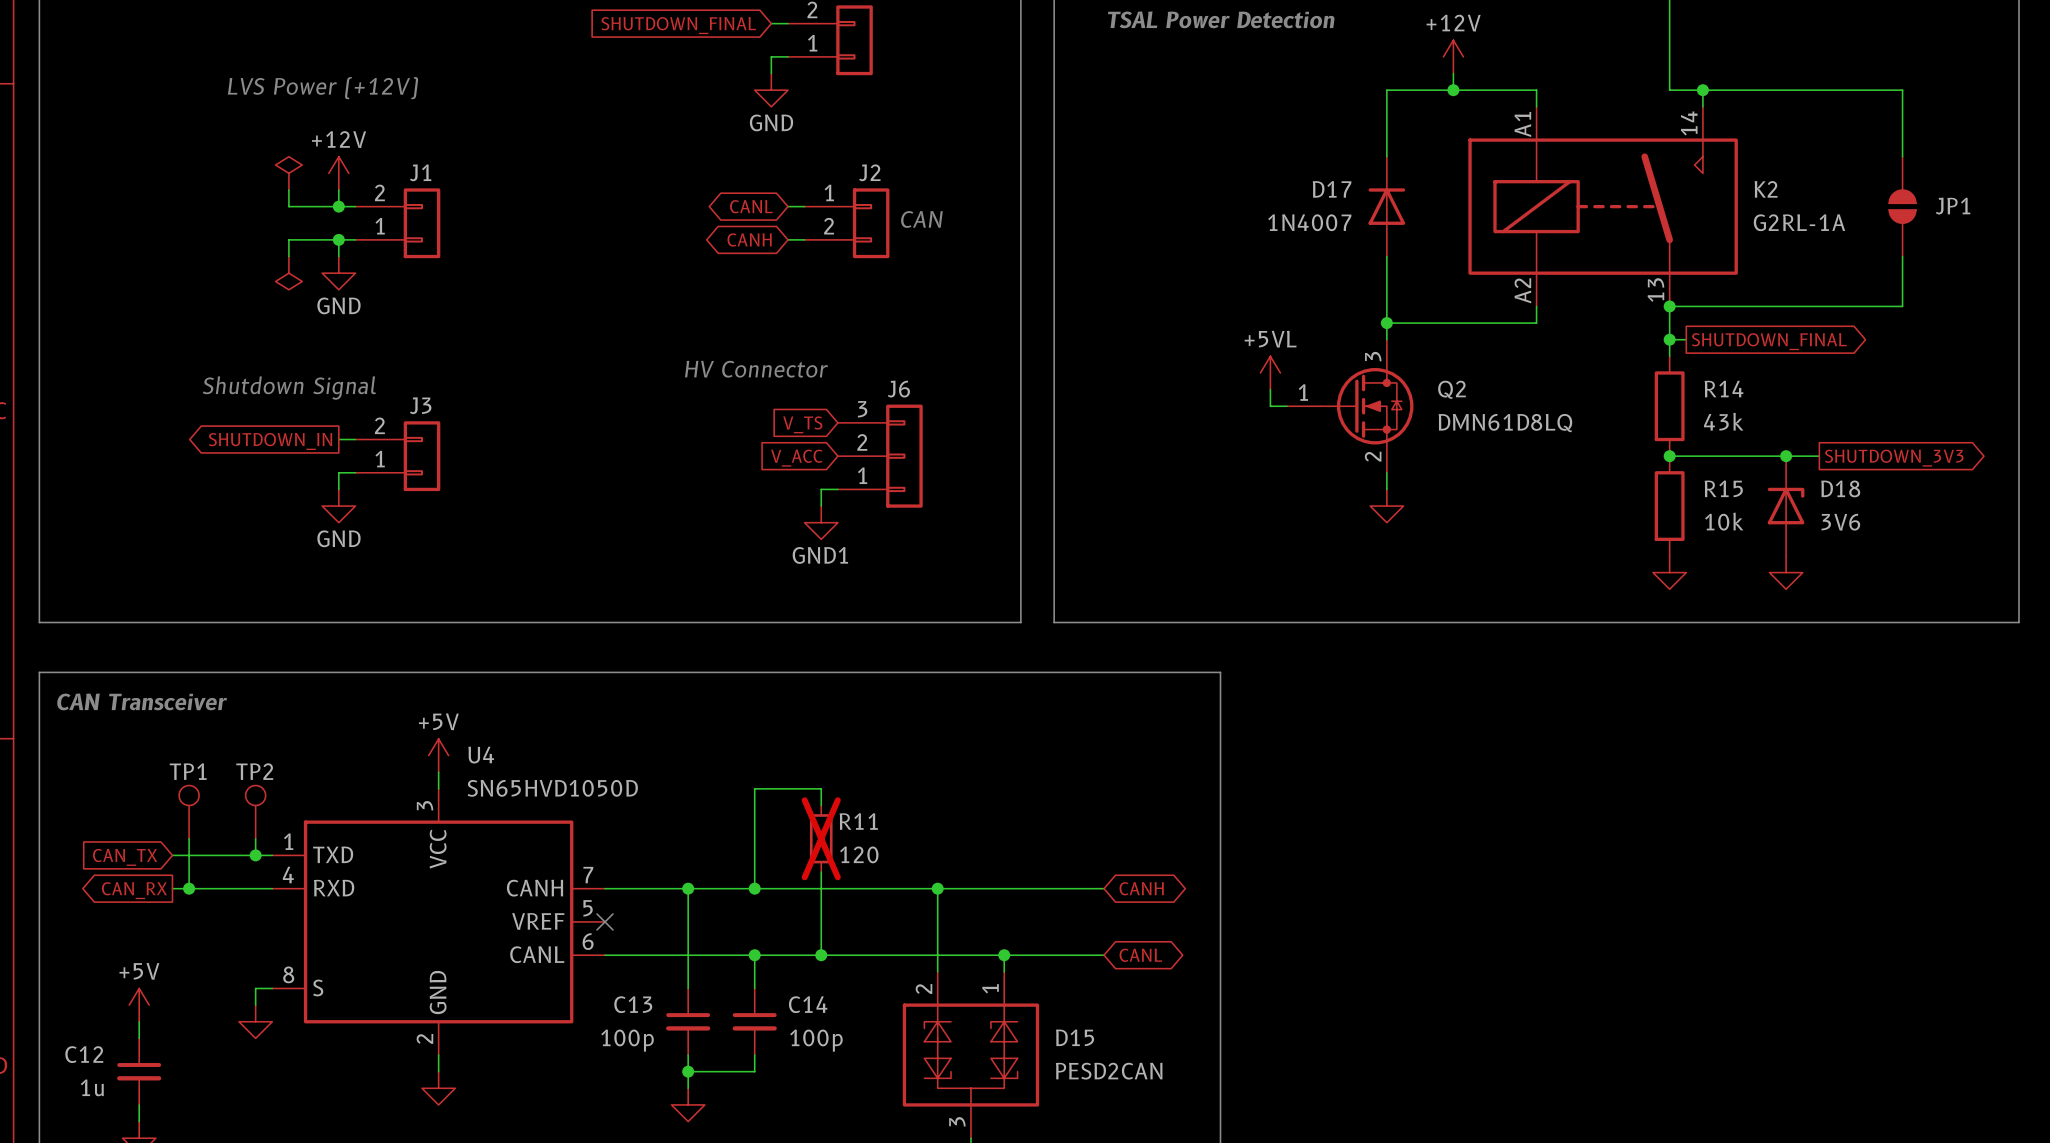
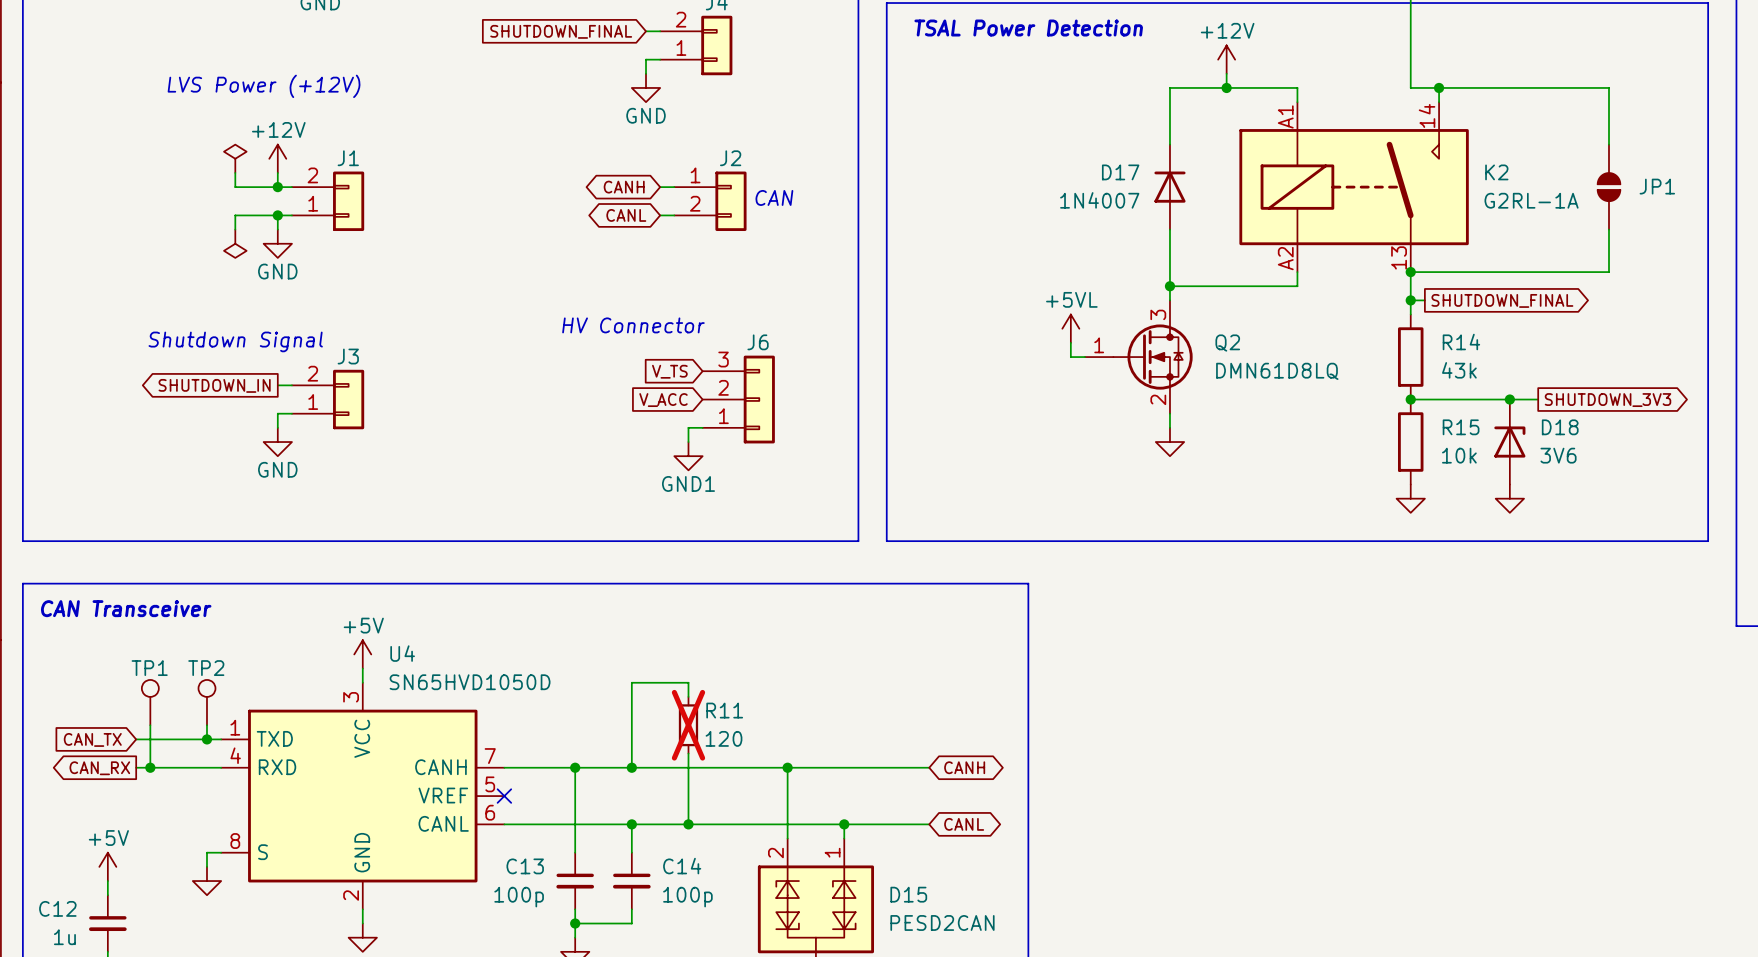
global label: CANL (751, 206) -> CANH (624, 187)
global label: CANH (749, 239) -> CANL (626, 215)

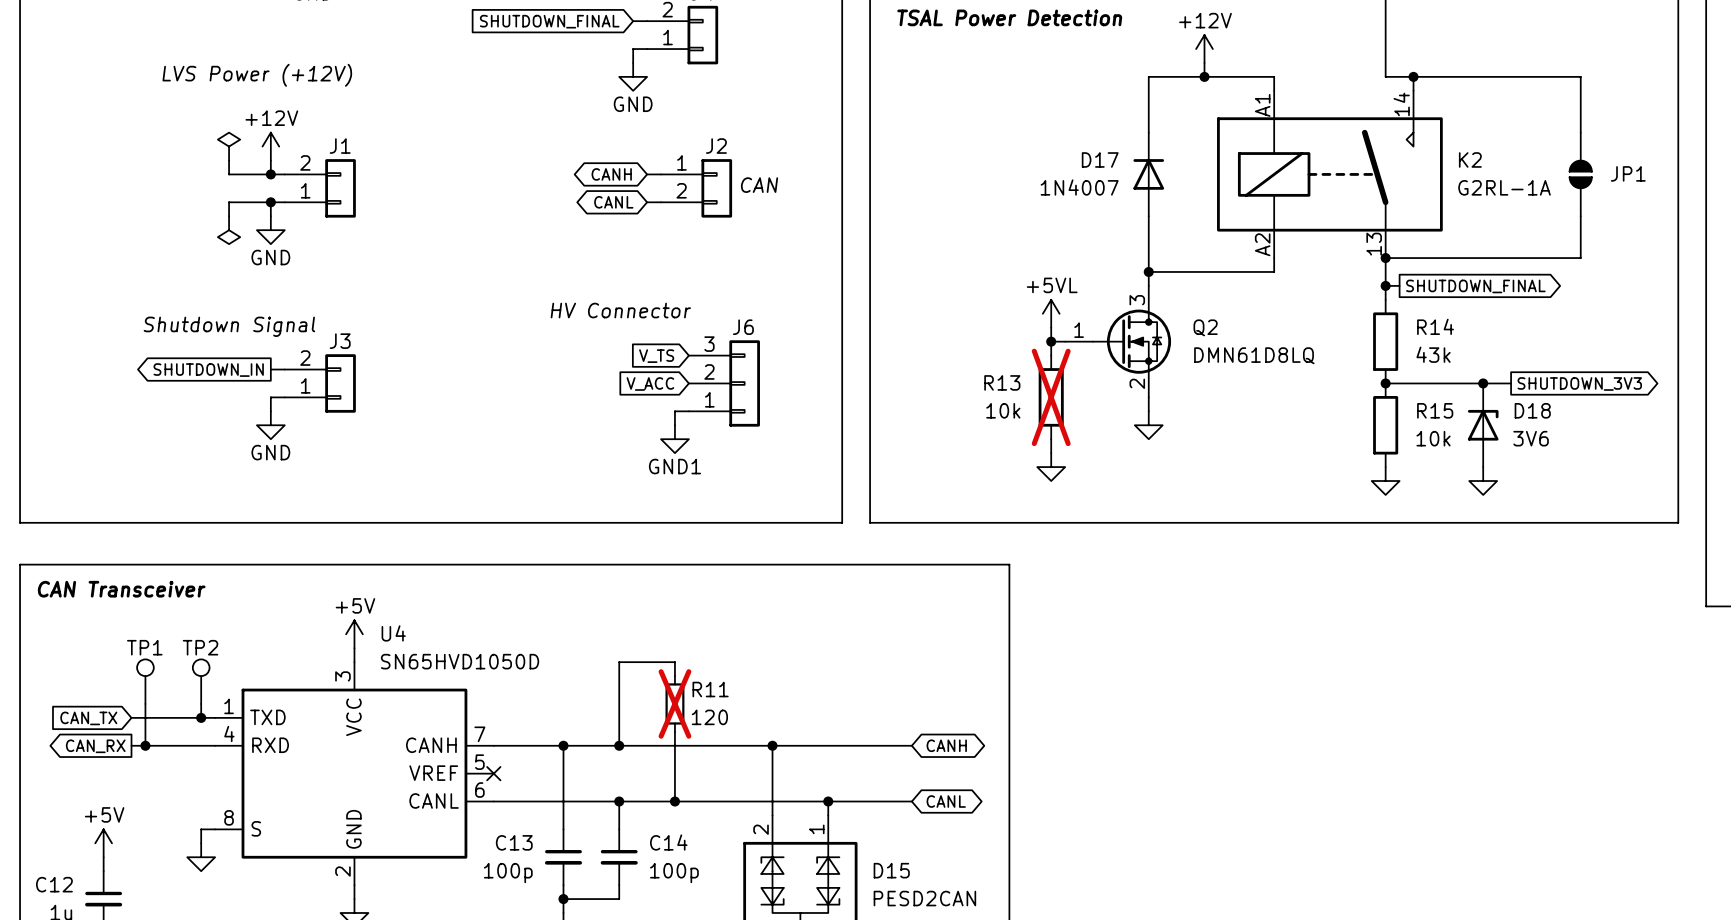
wire: none -> (1051, 341) (1051, 355)
junction: none -> (1051, 341)
R13: none -> 10k (1051, 397)
wire: none -> (1051, 439) (1051, 453)
power symbol: none -> (1051, 467)

